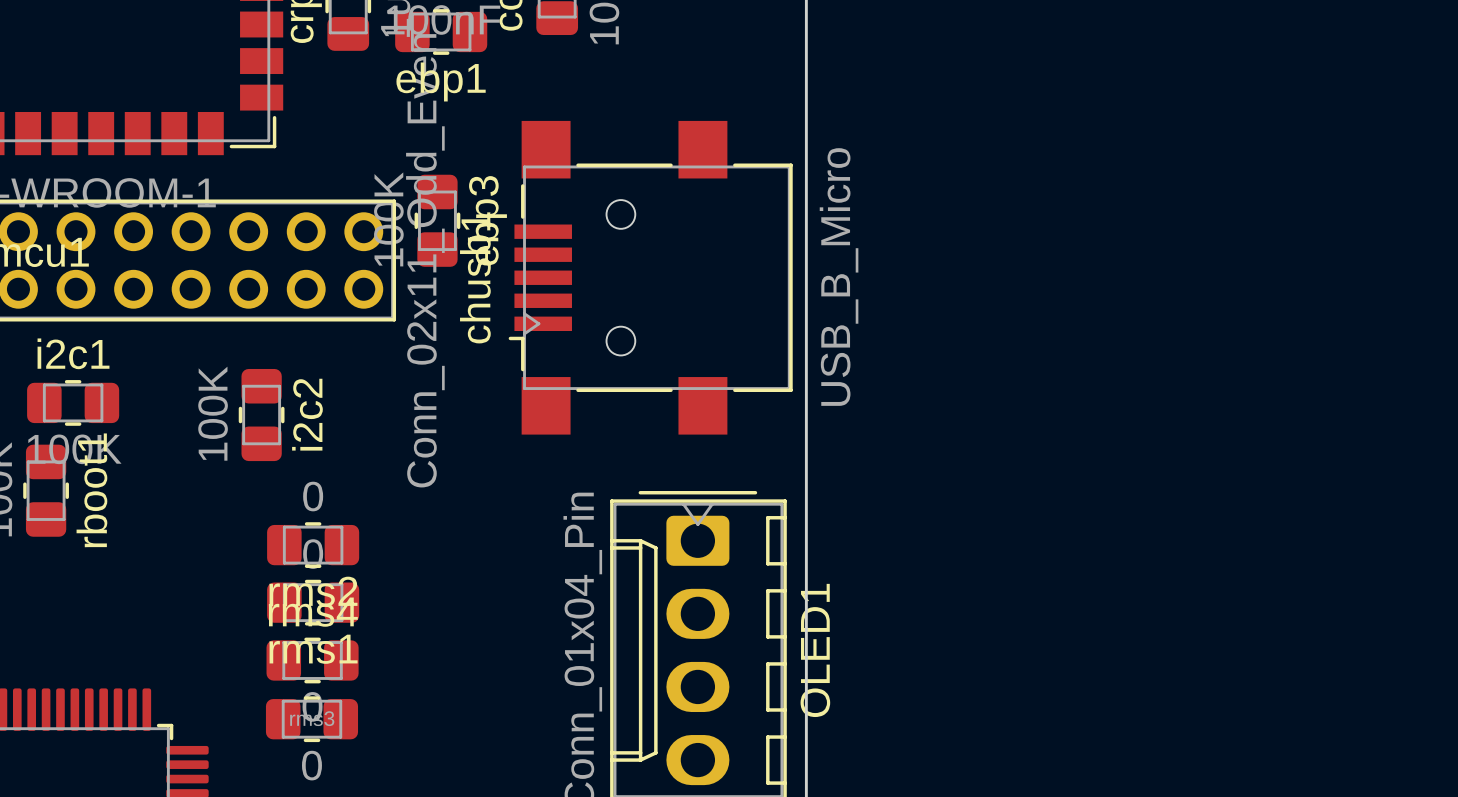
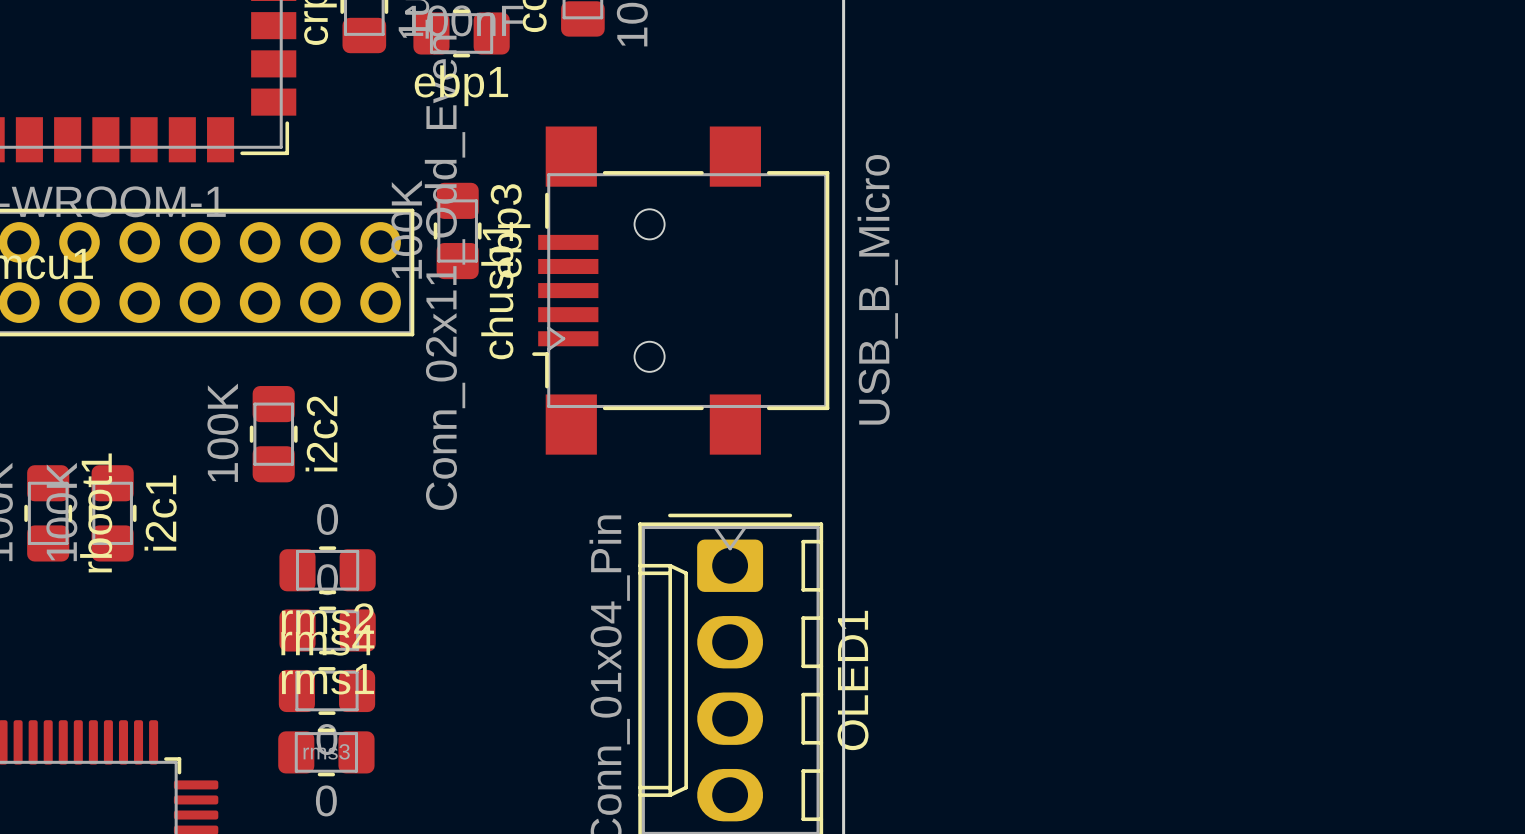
i2c1 rotation: 0° (73, 402) -> 90° clockwise (112, 513)
i2c1 position: (73, 402) -> (112, 513)

